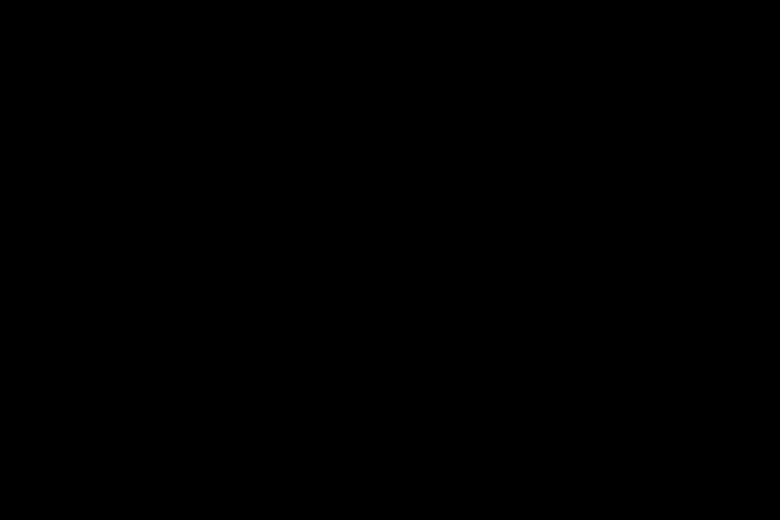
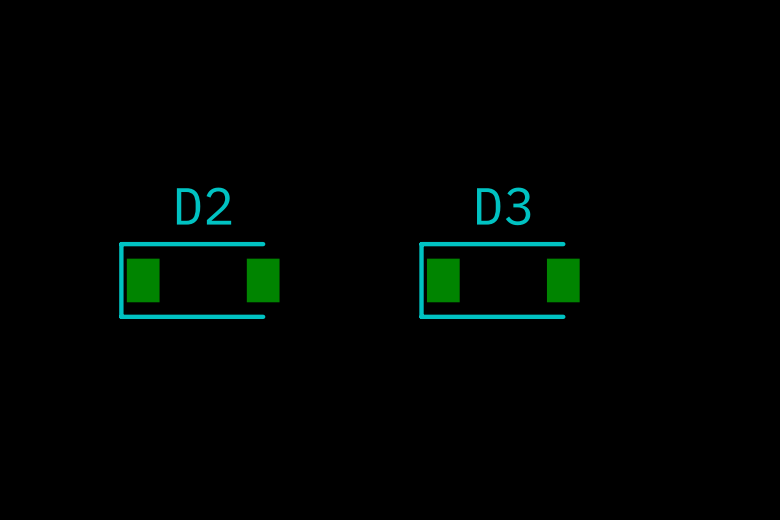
D2: none -> (199, 280)
D3: none -> (499, 280)

